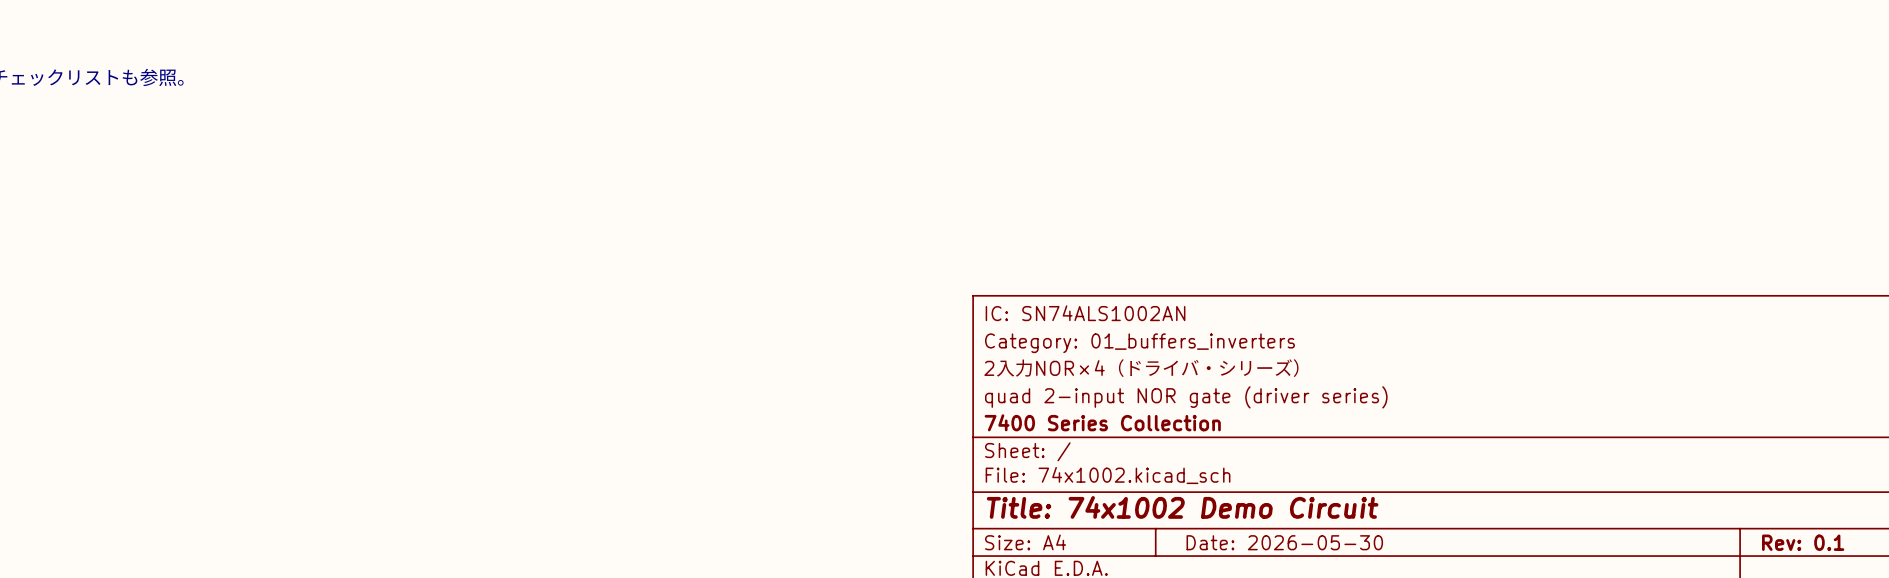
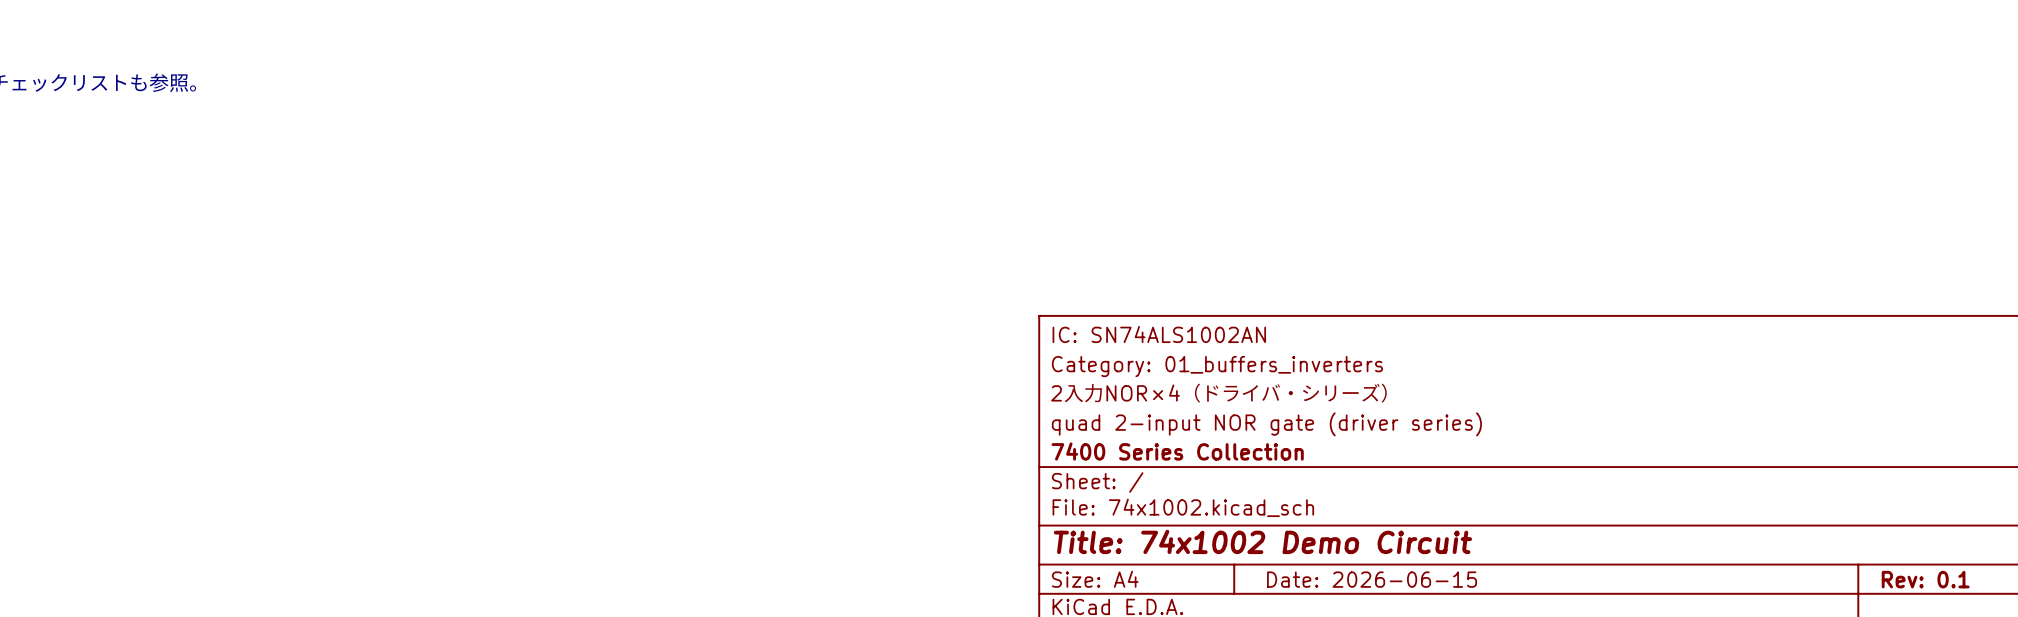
title block: Date: 2026-05-30 (1284, 542) -> Date: 2026-06-15 (1372, 579)

